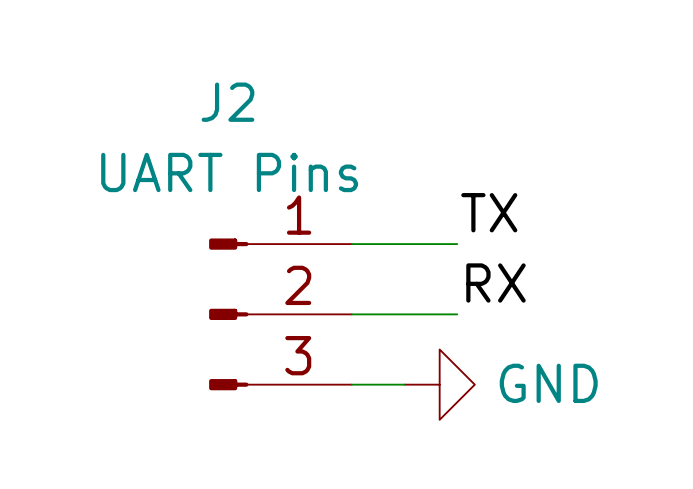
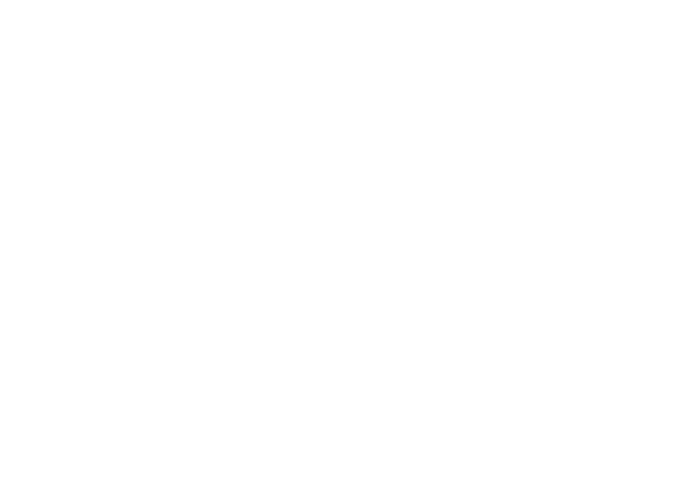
label: TX (489, 212) -> none
wire: (351, 244) (457, 244) -> none
label: RX (495, 283) -> none
J2: UART Pins (280, 314) -> none
wire: (351, 314) (457, 314) -> none
wire: (351, 384) (404, 384) -> none
power symbol: GND (439, 384) -> none

